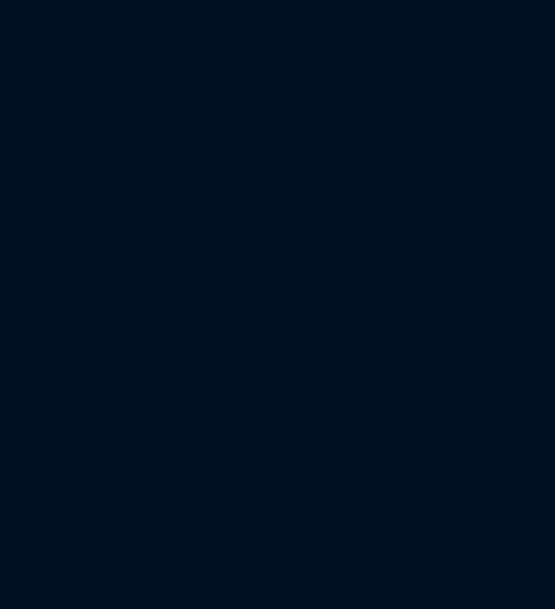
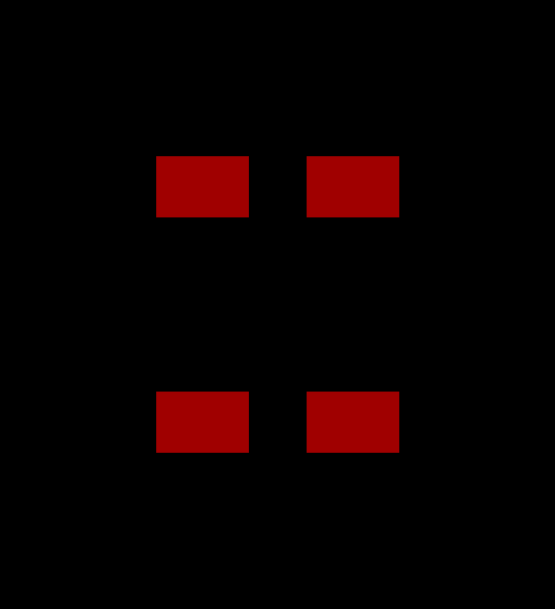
part: none -> (277, 186)
part: none -> (277, 422)

